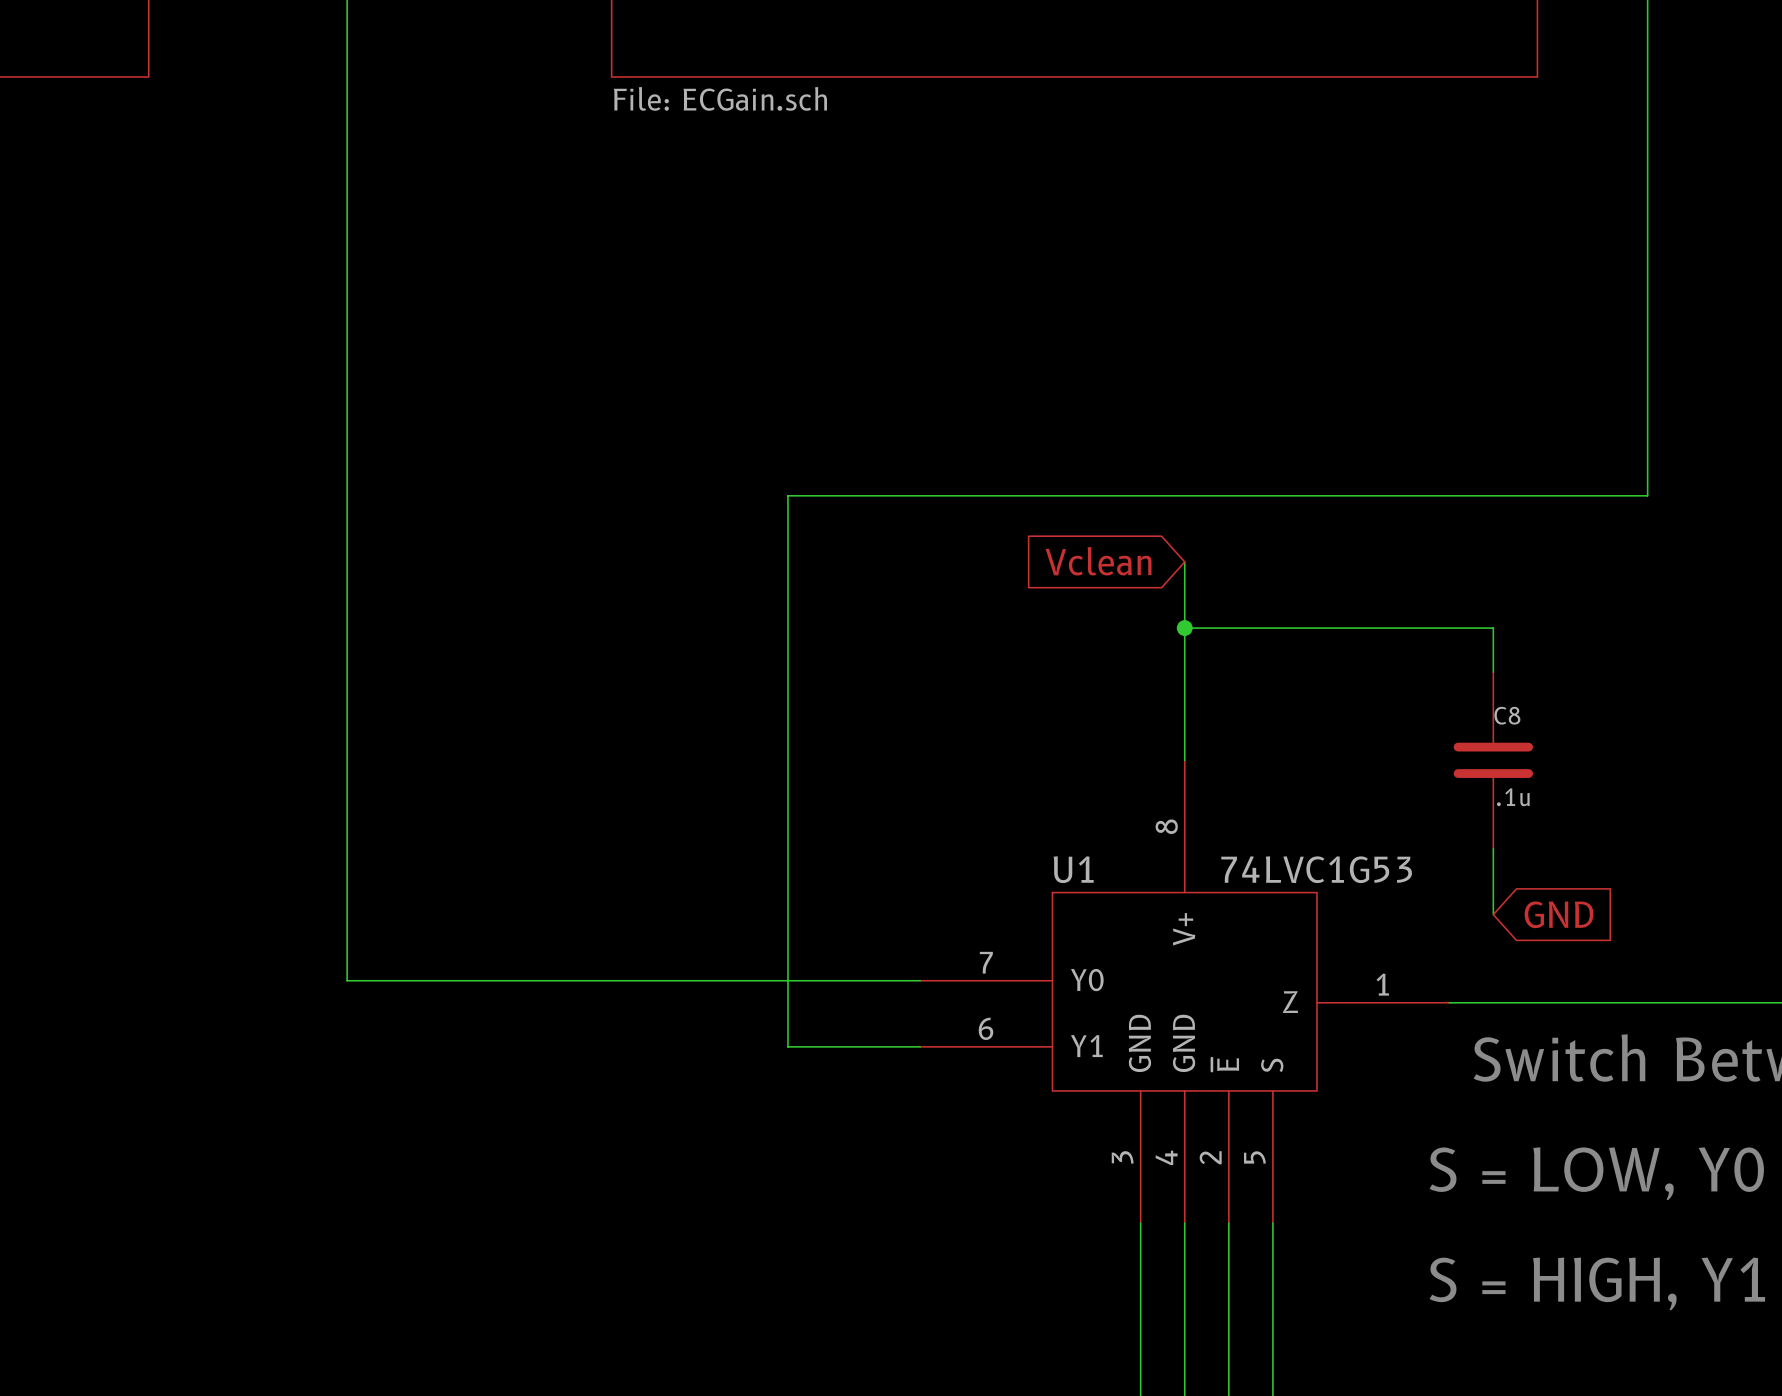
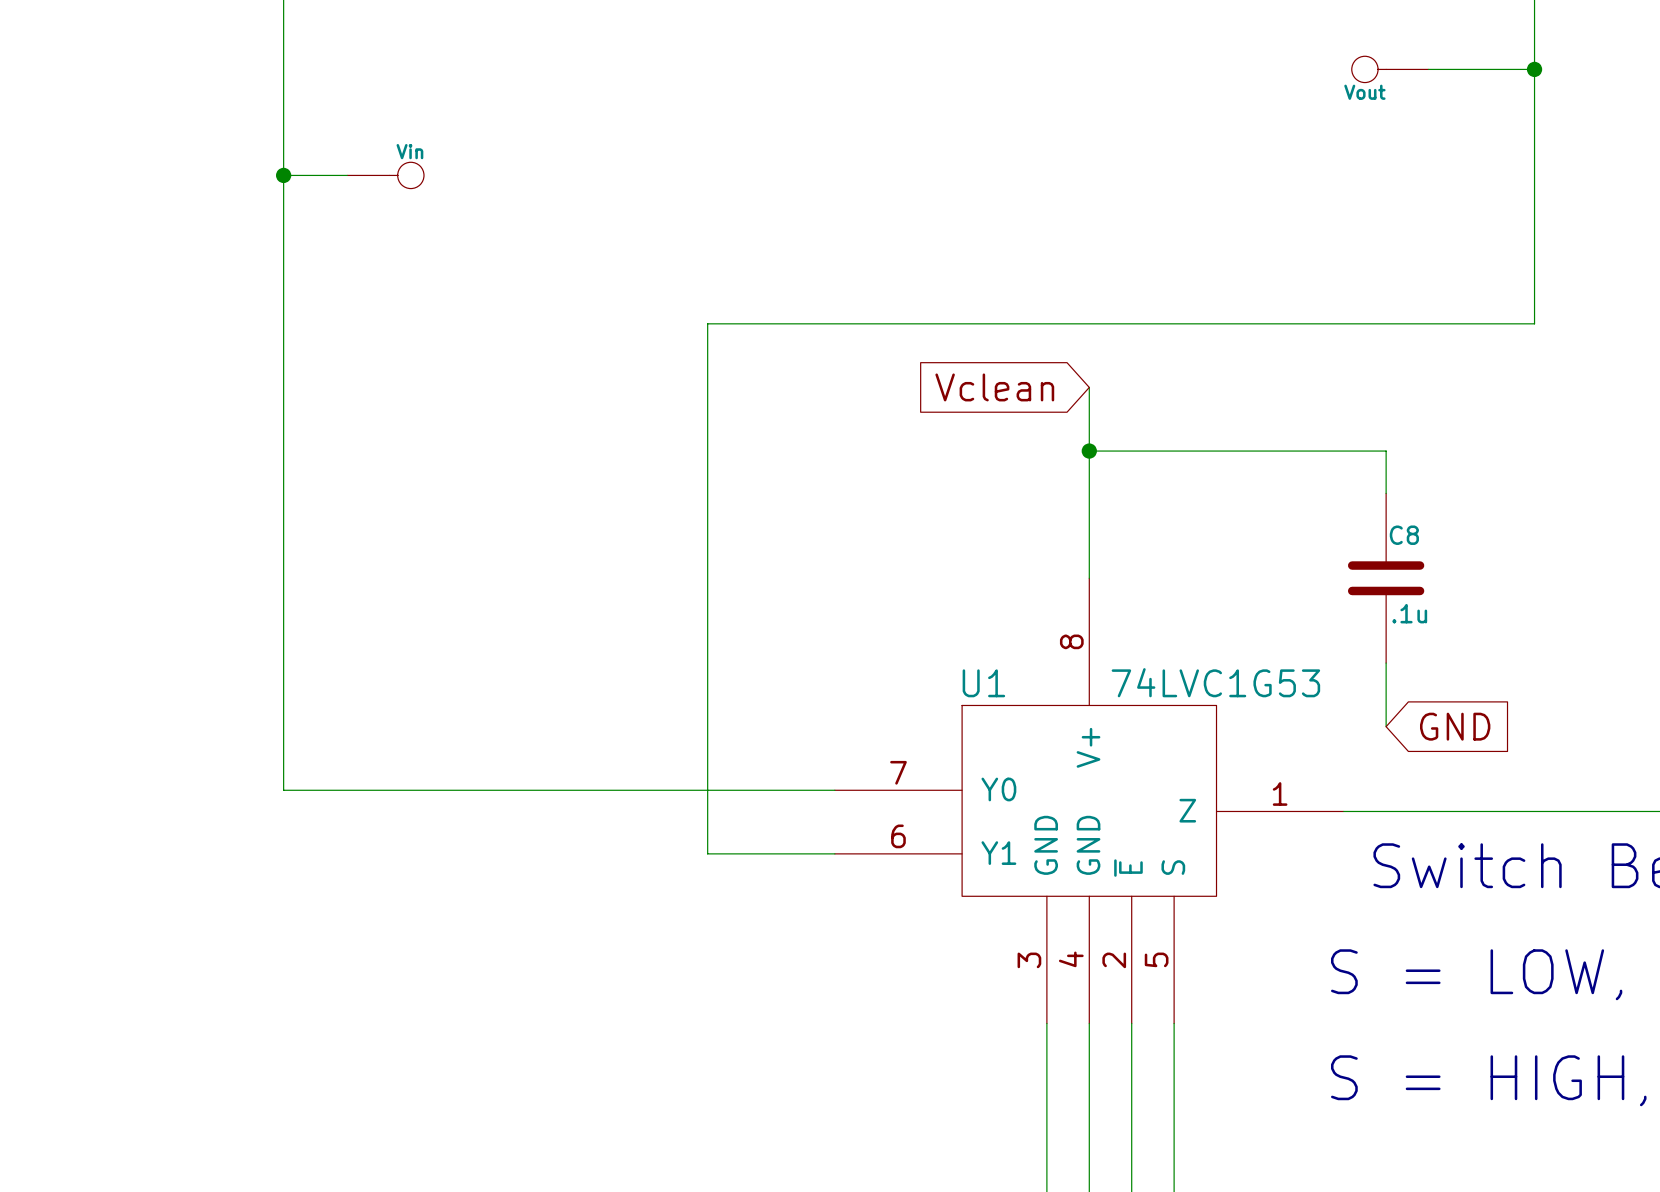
part: none -> Vout (1390, 69)
wire: none -> (1428, 69) (1534, 69)
junction: none -> (1534, 69)
wire: none -> (283, 175) (347, 175)
junction: none -> (283, 175)
part: none -> Vin (385, 175)

